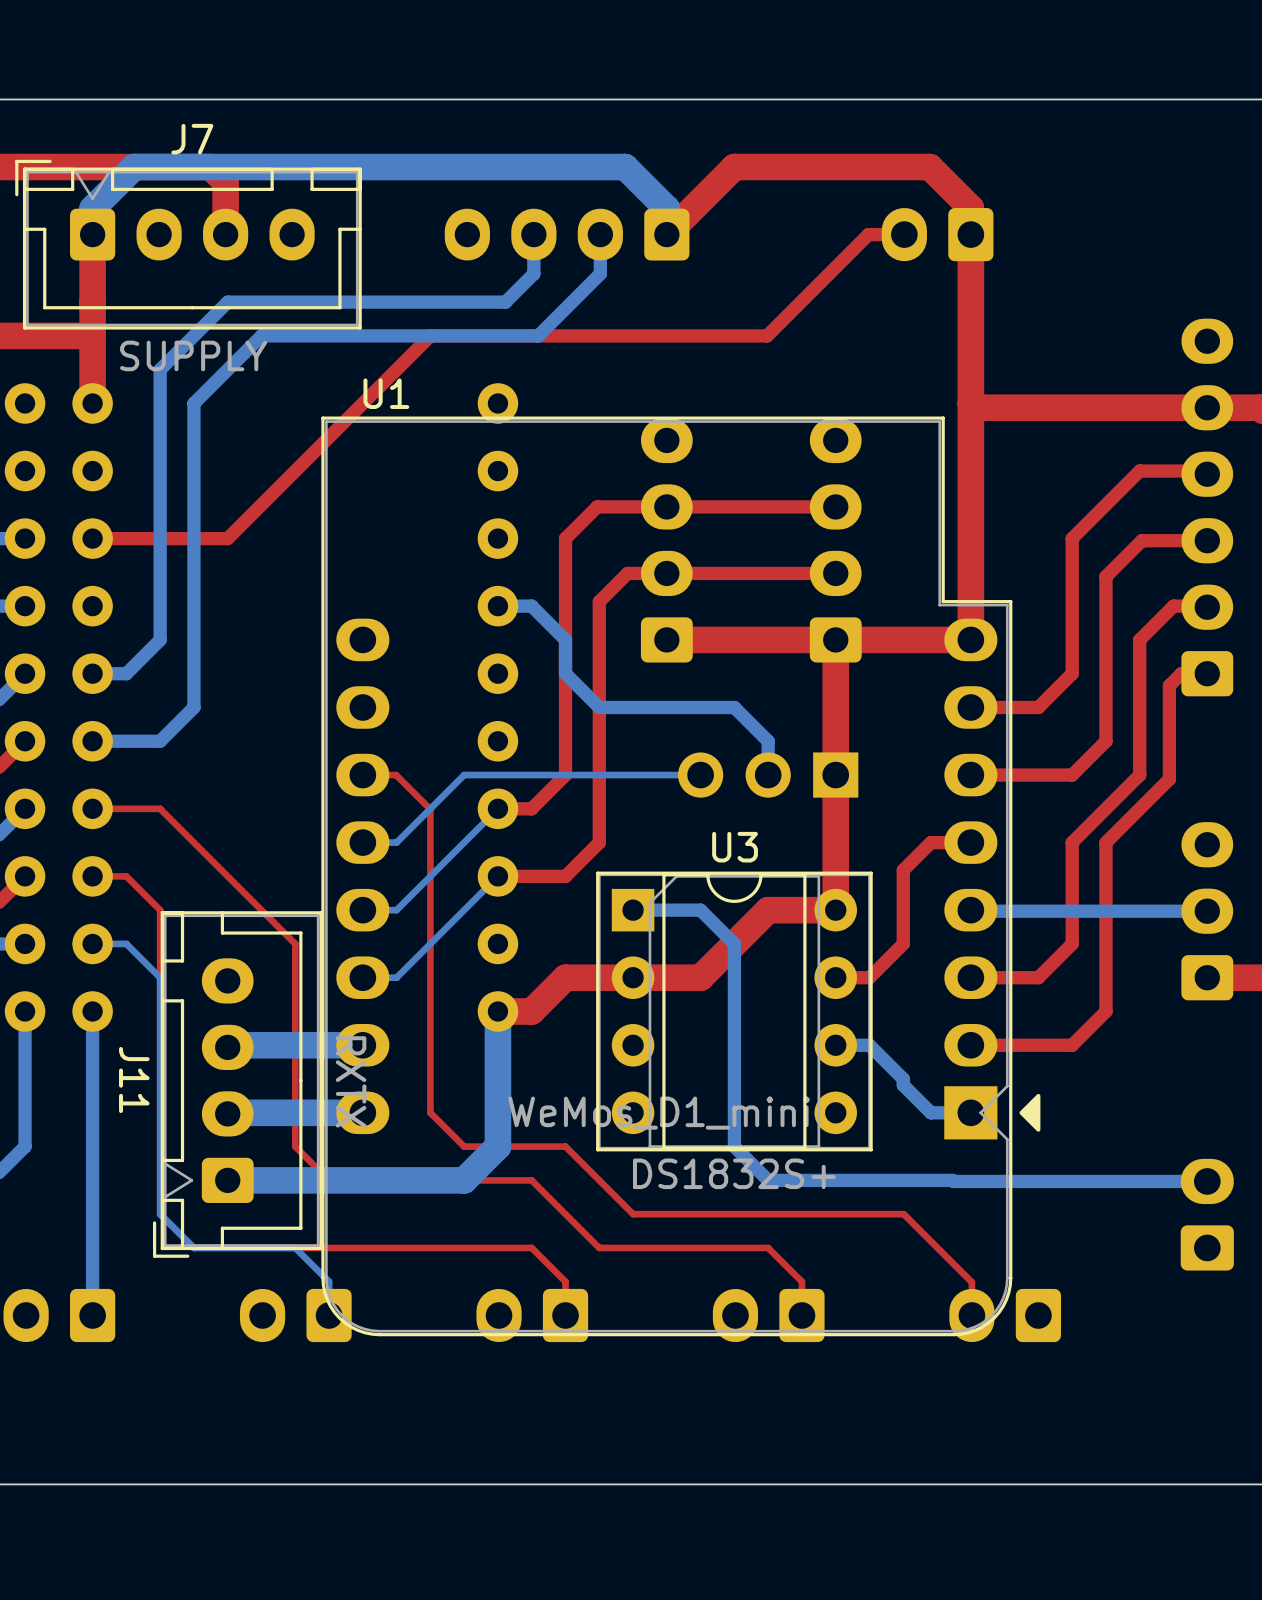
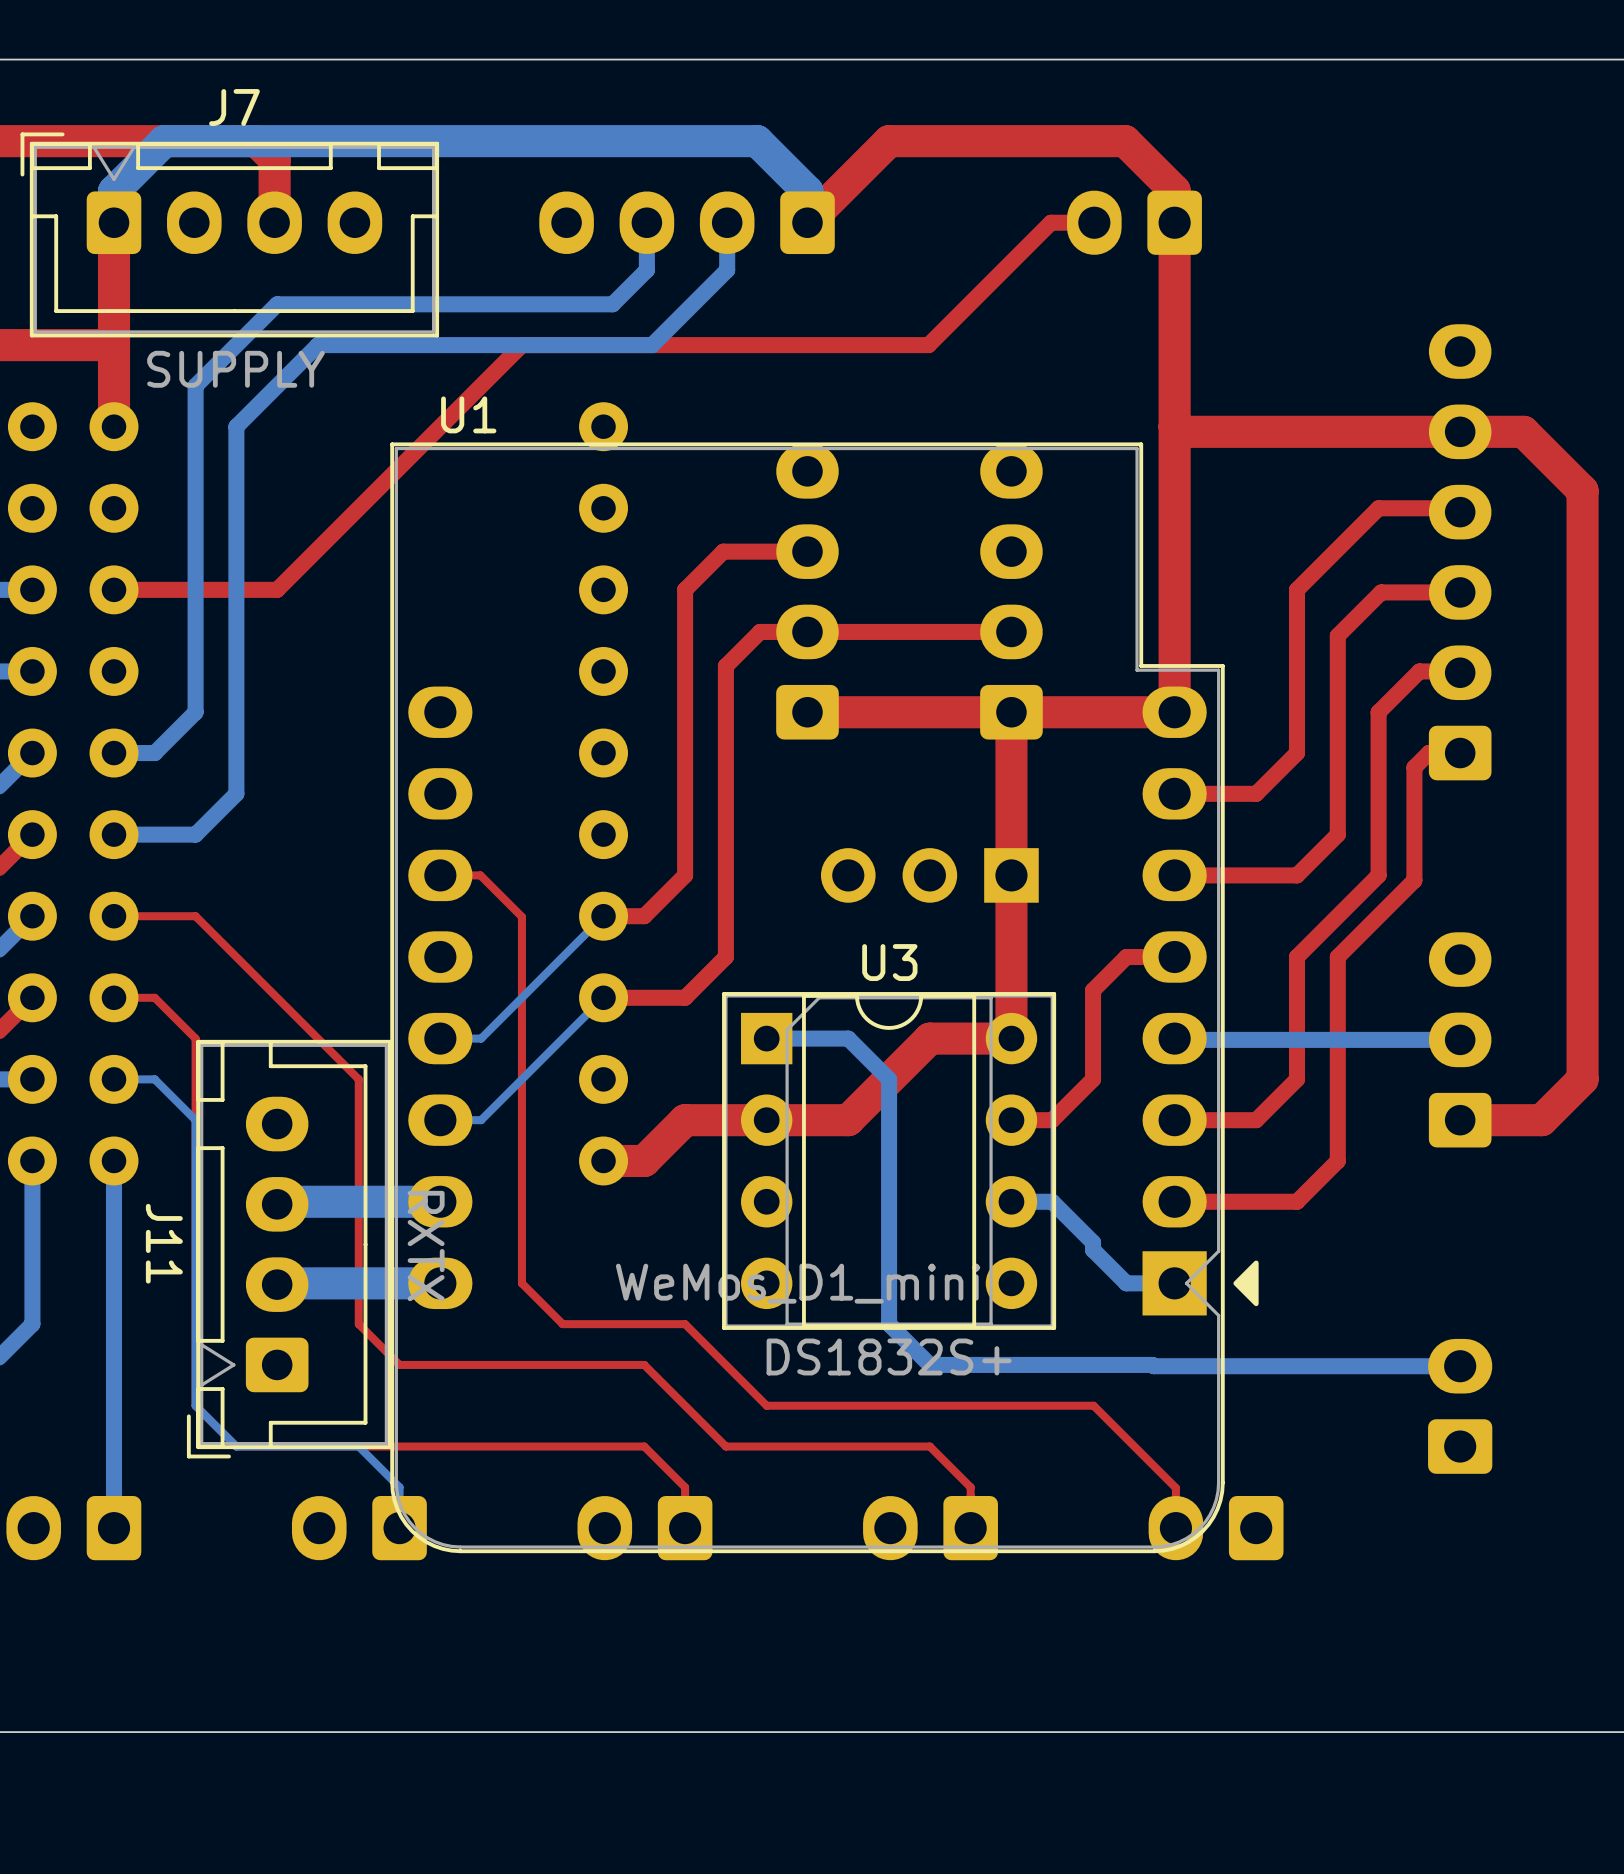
top track: (835, 506) (666, 506) -> none
bottom track: (497, 606) (531, 606) (565, 639) (565, 673) (599, 707) (734, 707) (768, 741) (768, 775) -> none
bottom track: (700, 775) (464, 775) (396, 842) (362, 842) -> none
bottom track: (497, 1011) (497, 1146) (464, 1180) (227, 1180) -> none

